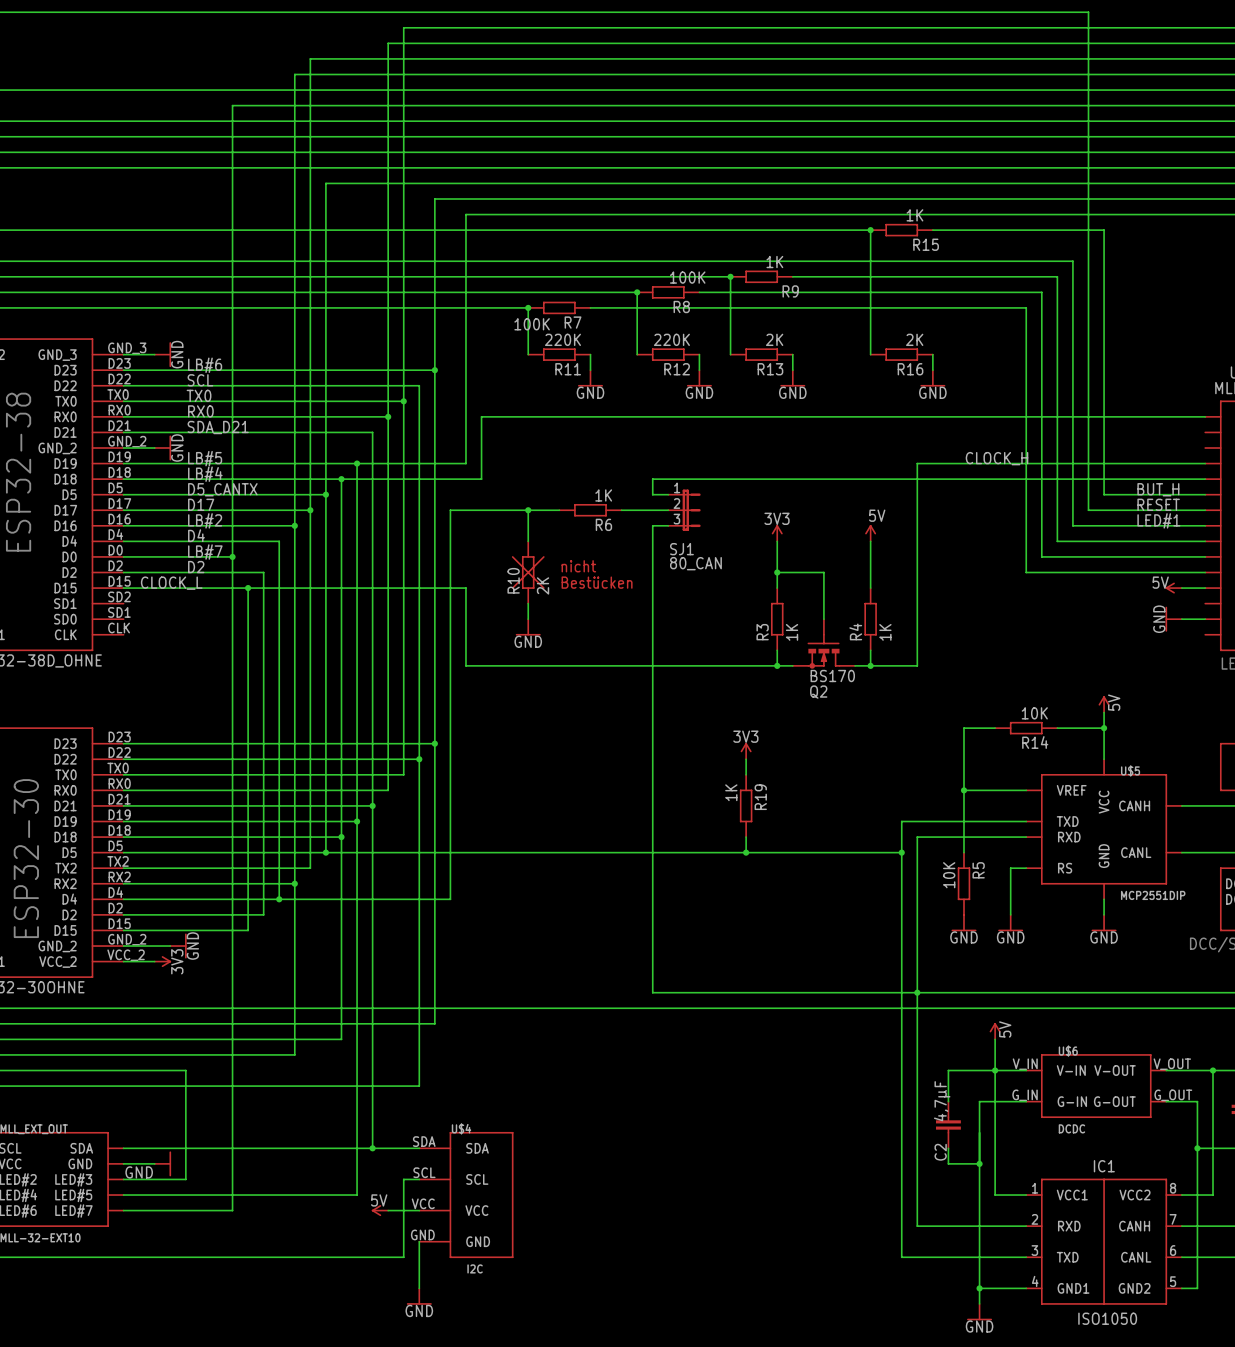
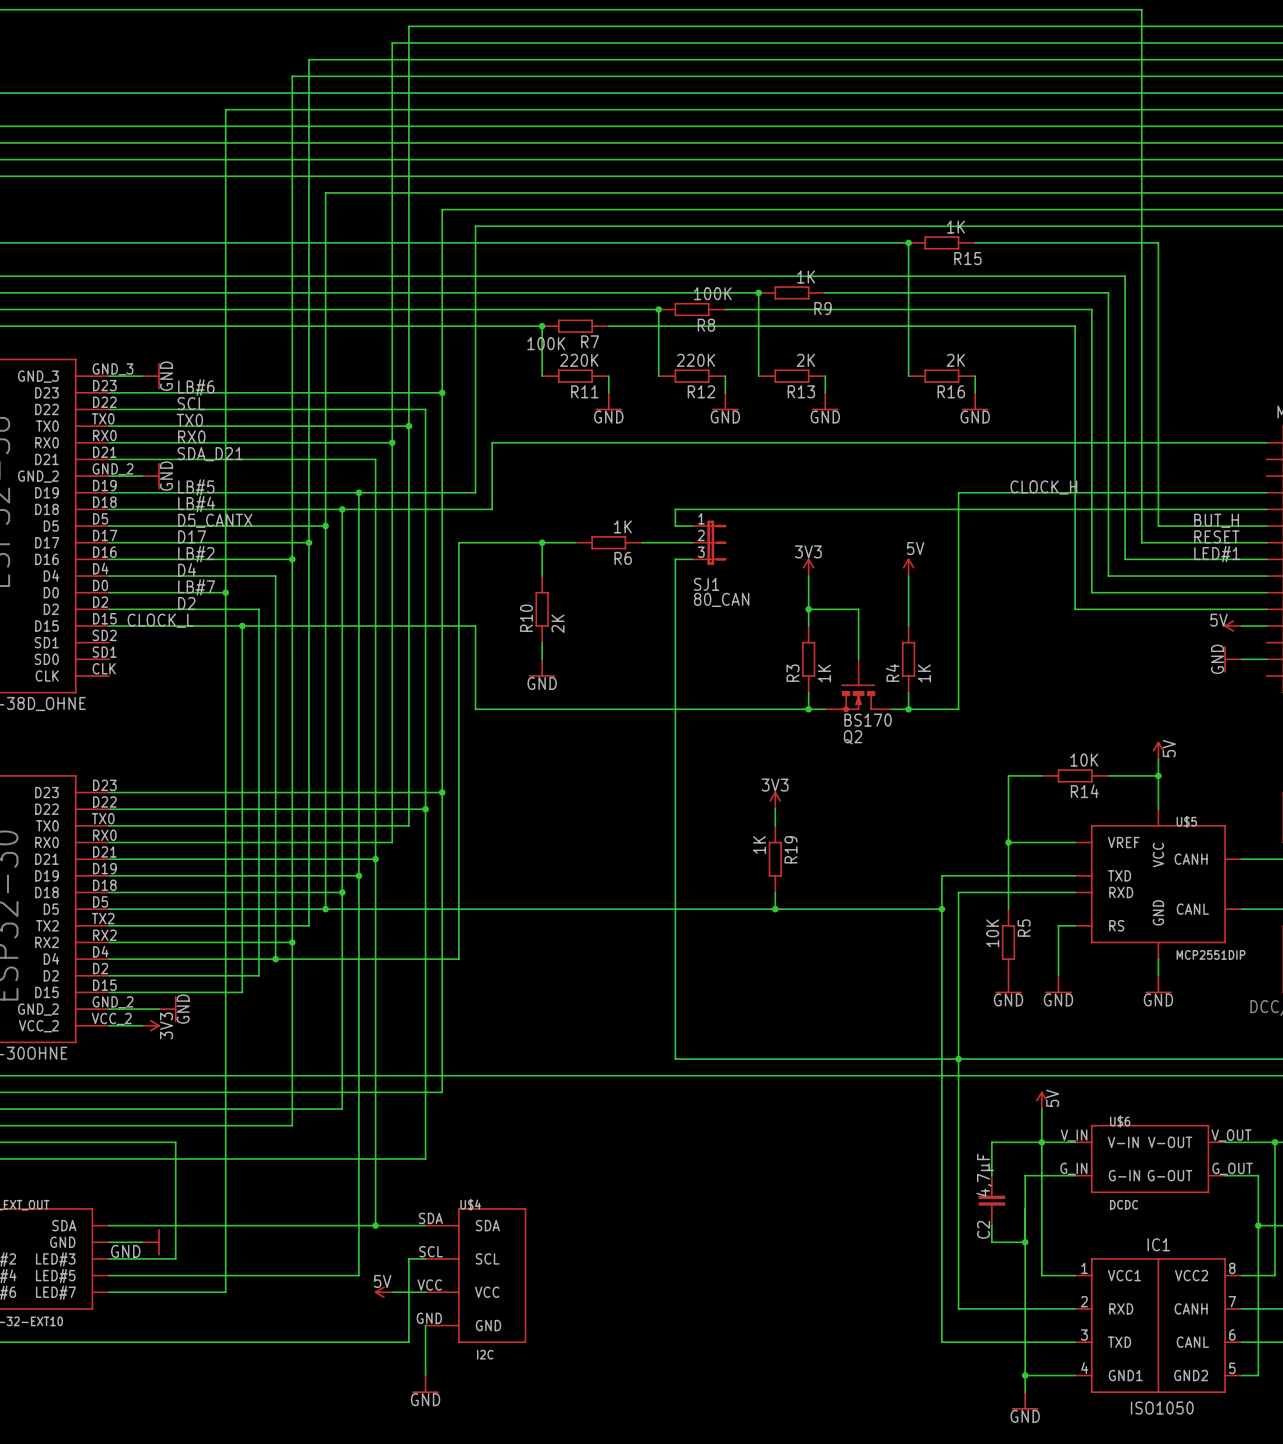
line: (512, 556) (543, 588) -> none
line: (543, 556) (512, 588) -> none
text: nicht (578, 566) -> none
text: Bestücken (597, 582) -> none

